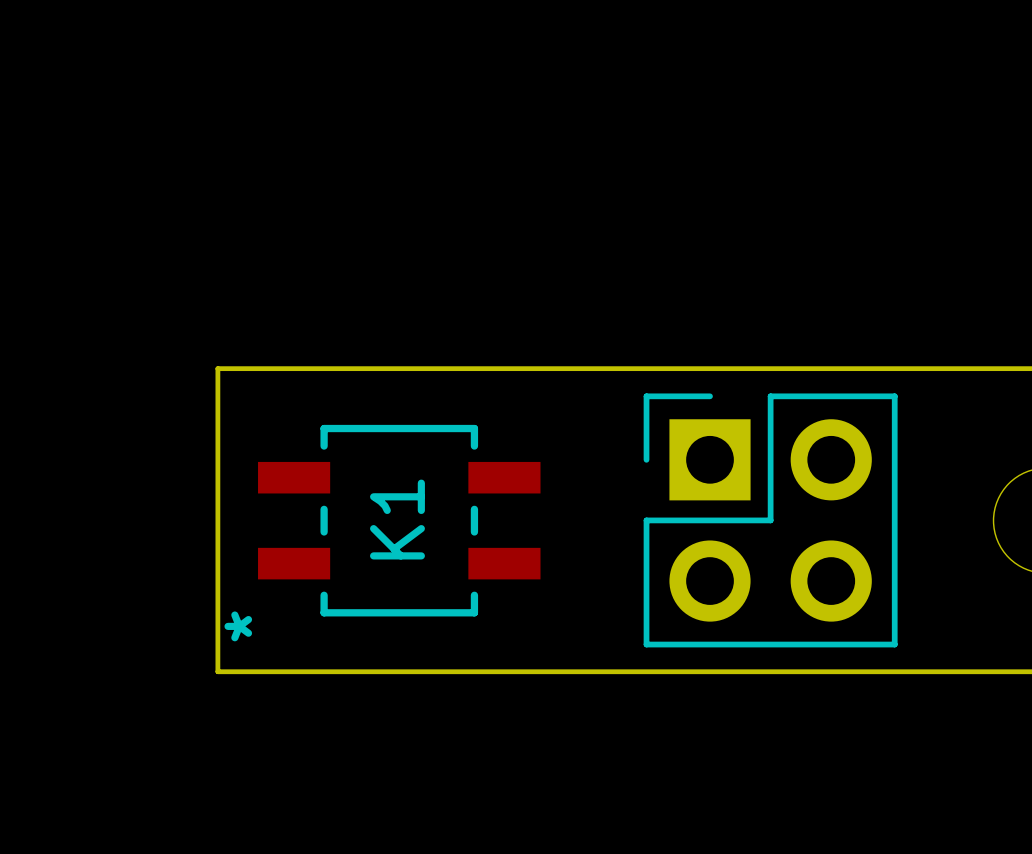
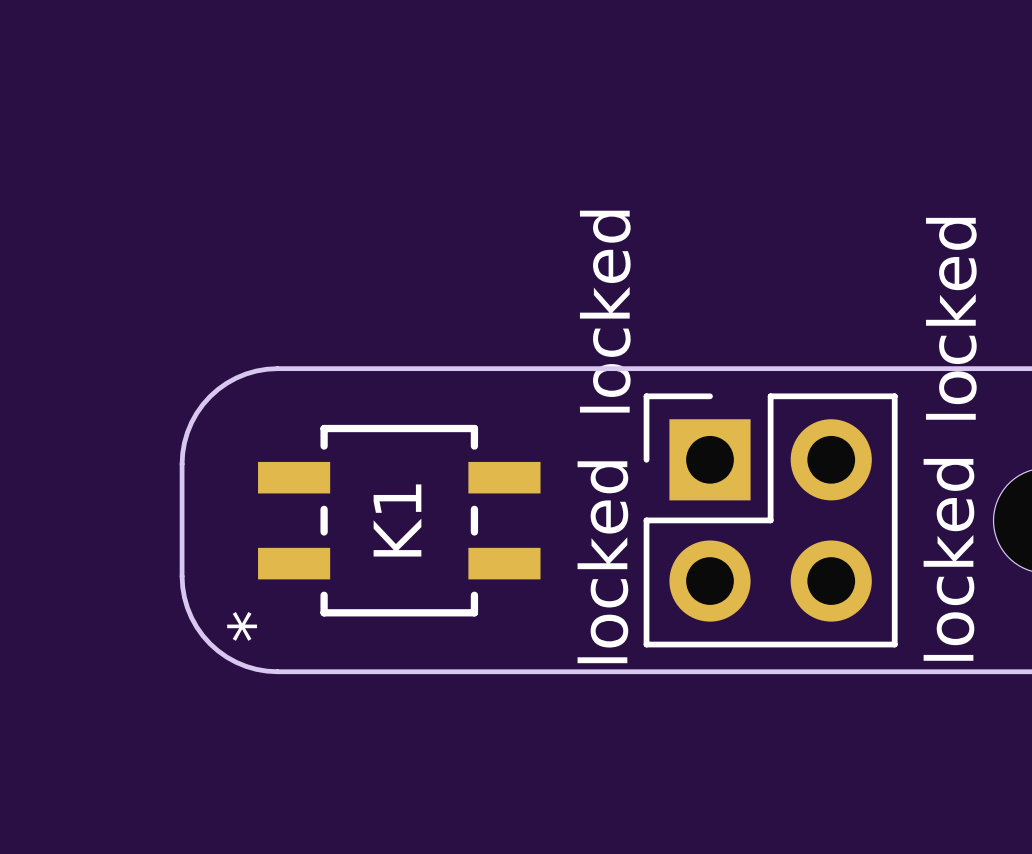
text: none -> locked (605, 311)
text: none -> locked (951, 318)
board edge: (277, 368) (217, 368) (217, 671) (277, 671) -> (277, 368) (246, 373) (226, 383) (210, 396) (196, 413) (187, 432) (182, 464) (182, 586) (191, 617) (202, 635) (226, 657) (246, 666) (277, 671)
text: none -> locked (948, 559)
text: none -> locked (602, 562)

